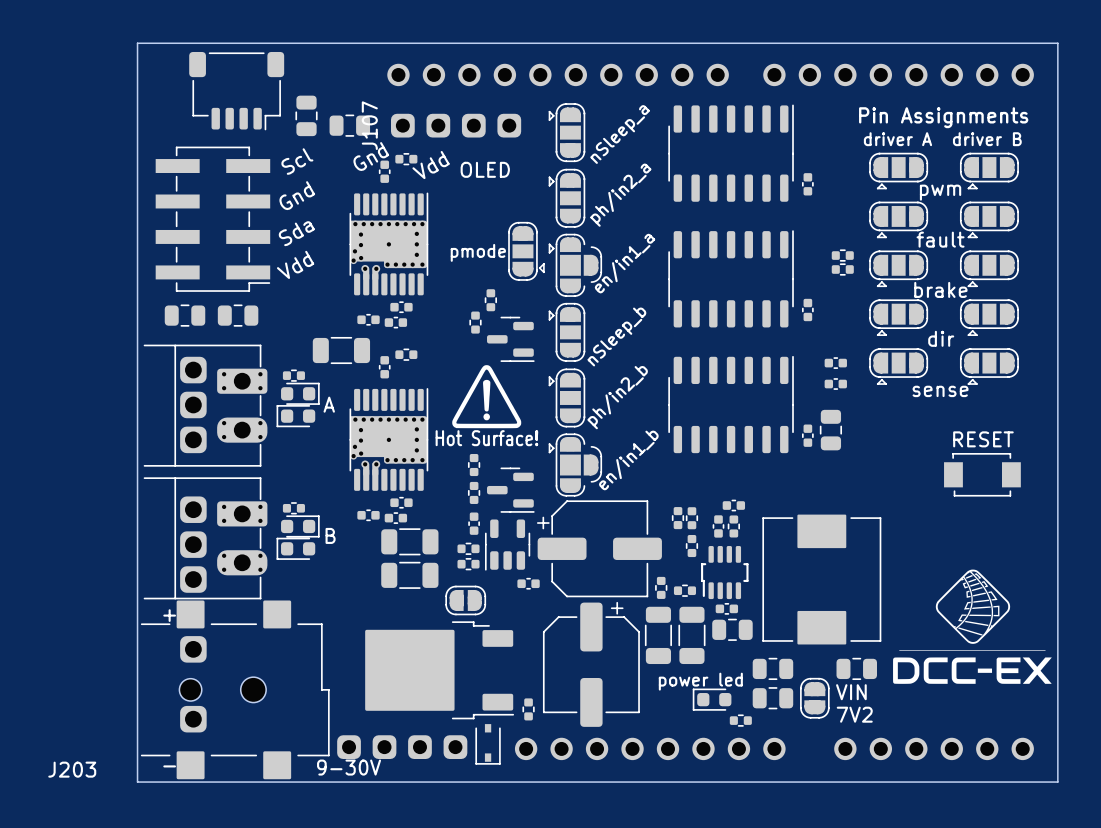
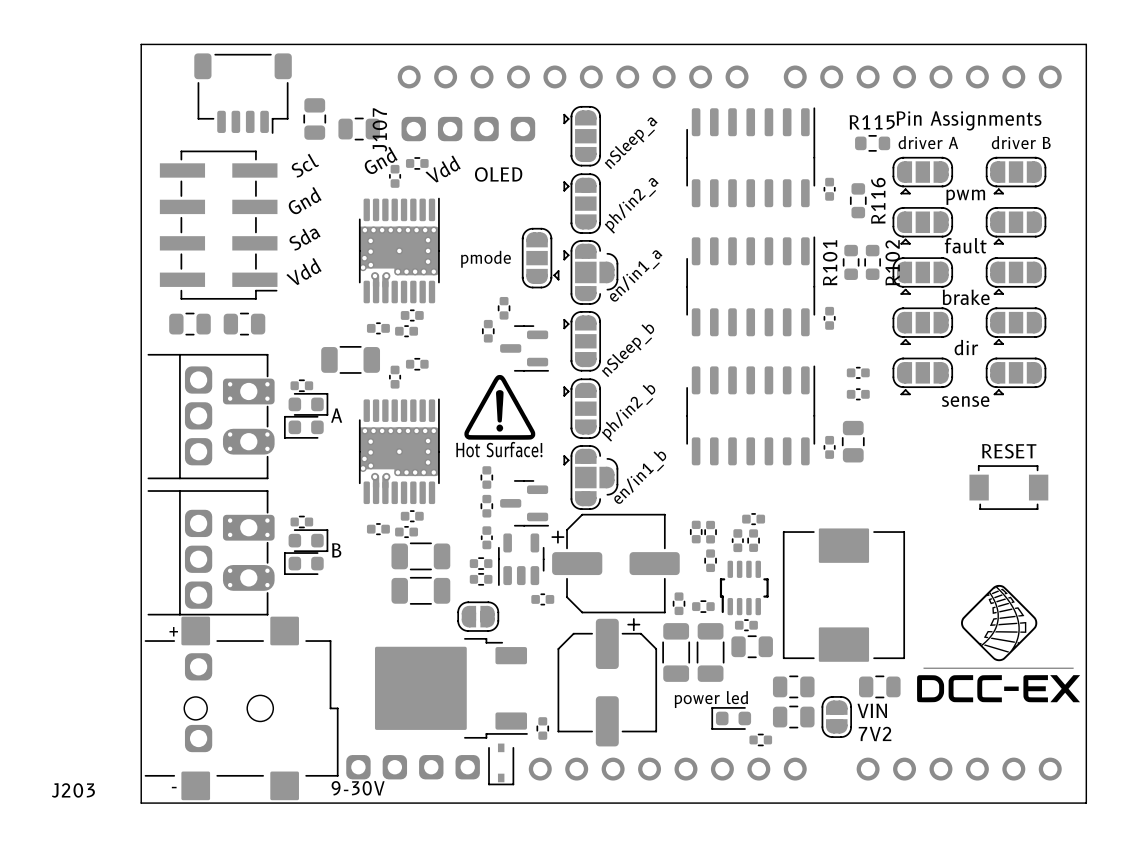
R115: none -> (872, 143)
R116: none -> (858, 200)
R101: none -> (851, 262)
part: (842, 255) -> none
R102: none -> (872, 262)
part: (842, 269) -> none

